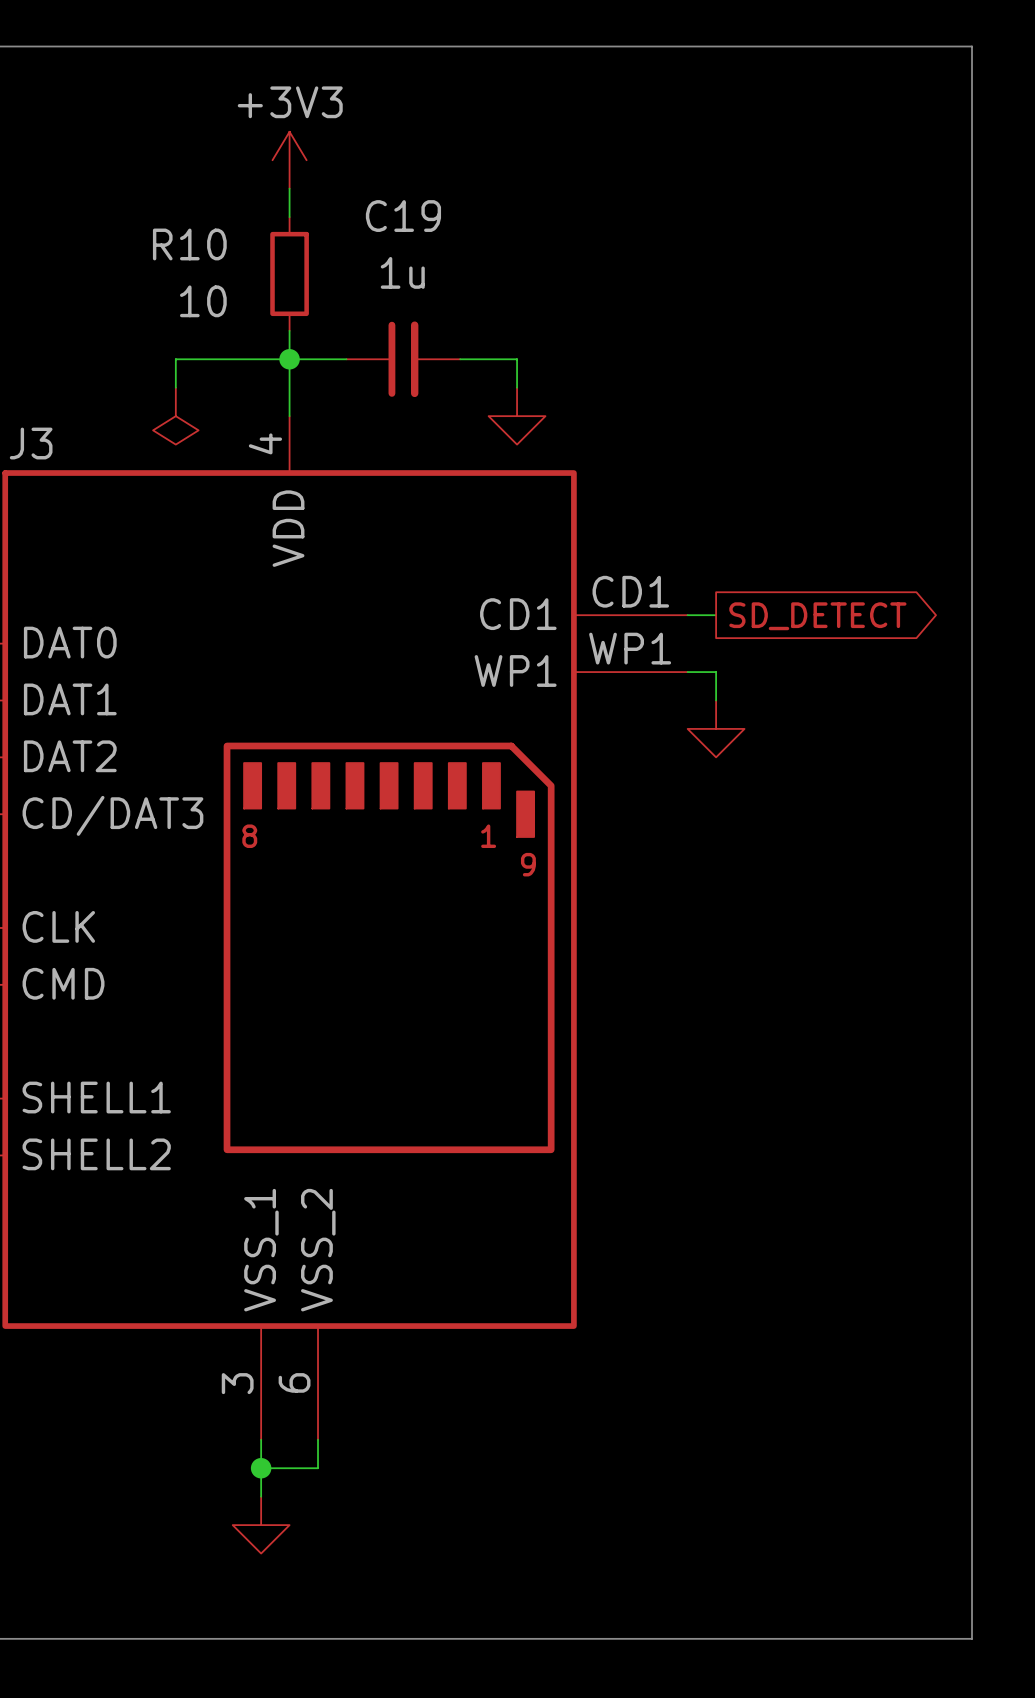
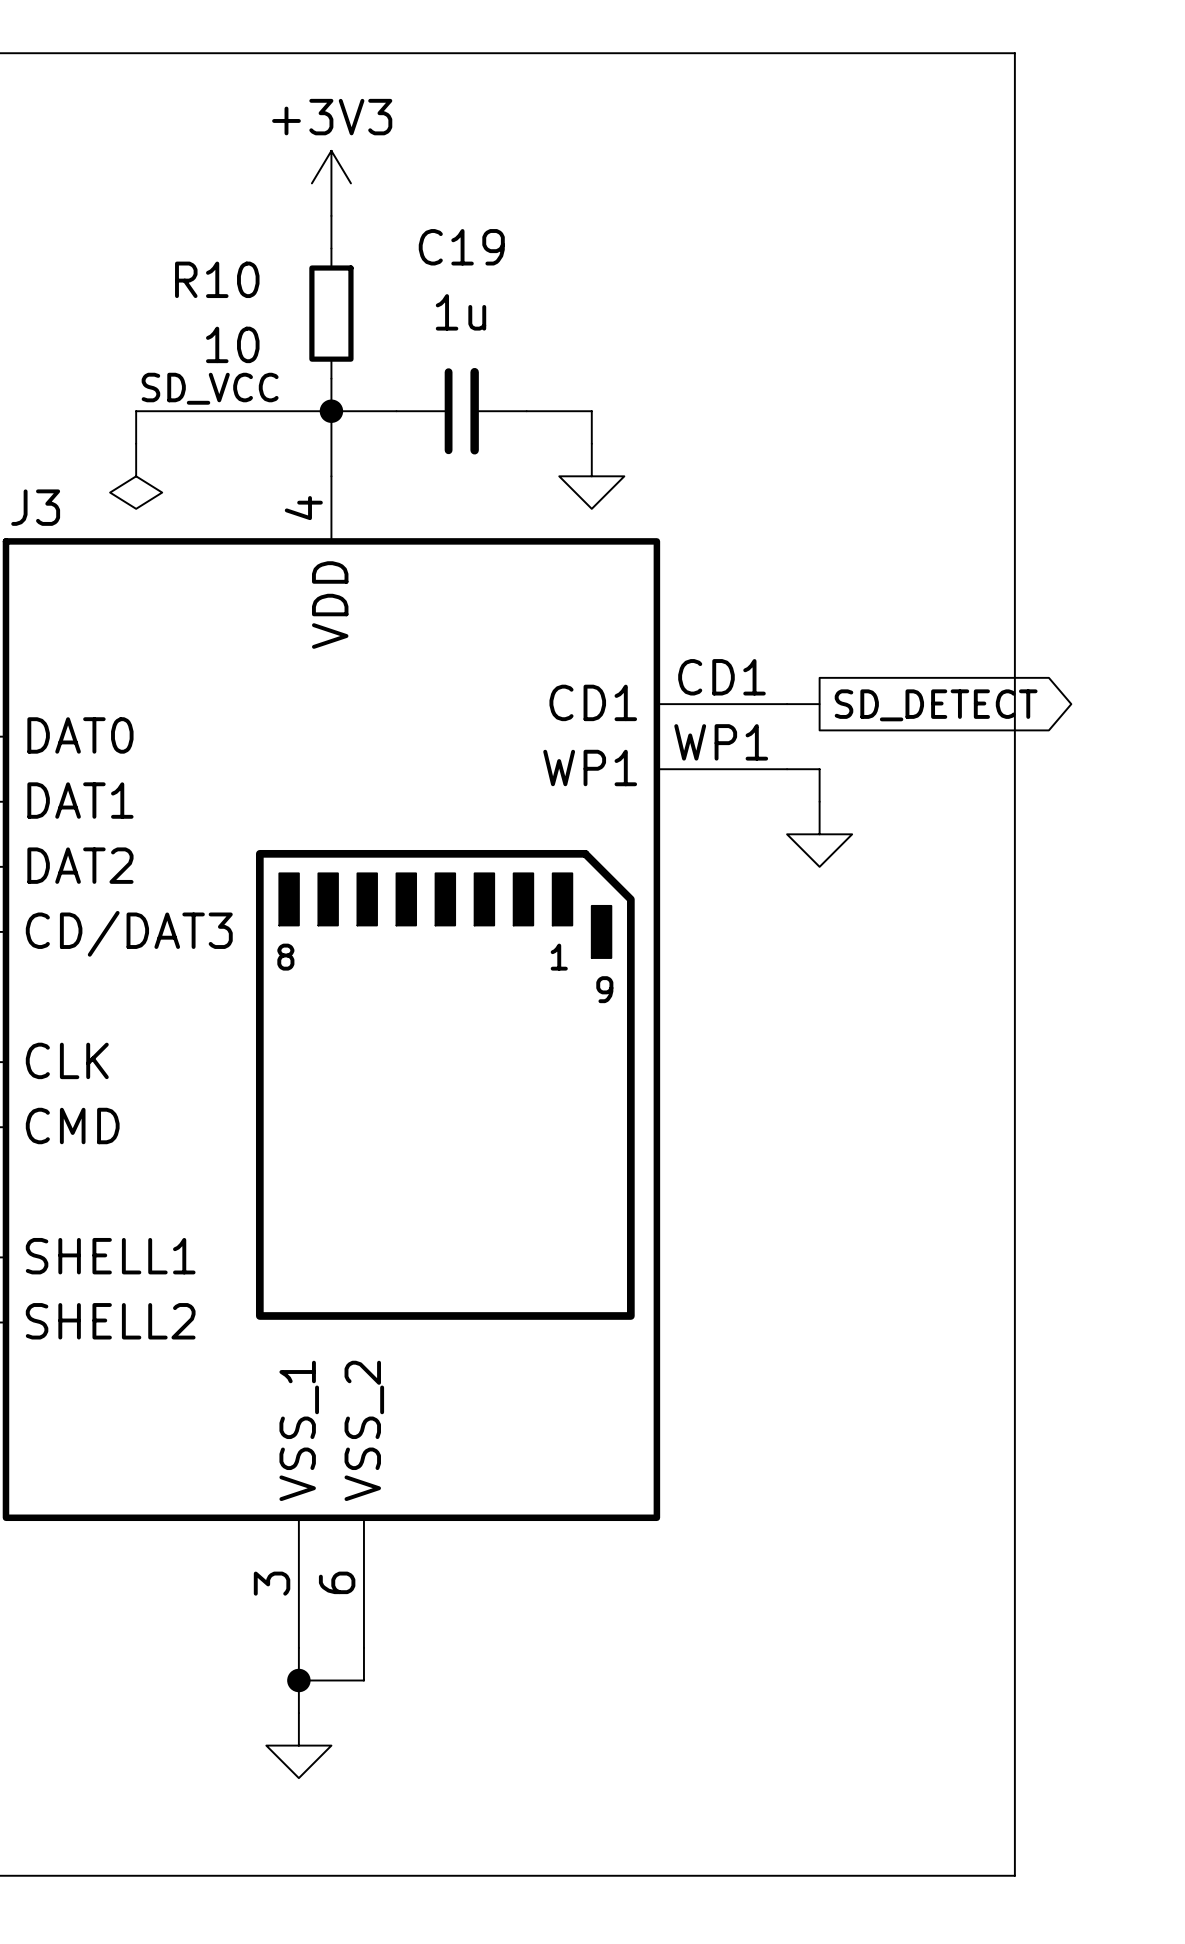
line: (886, 46) (972, 46) (972, 1638) (886, 1638) -> (1014, 53) (1014, 1875)
label: none -> SD_VCC (210, 388)
wire: (175, 359) (175, 387) -> (201, 411) (136, 411) (136, 443)
power symbol position: (175, 416) -> (136, 476)

